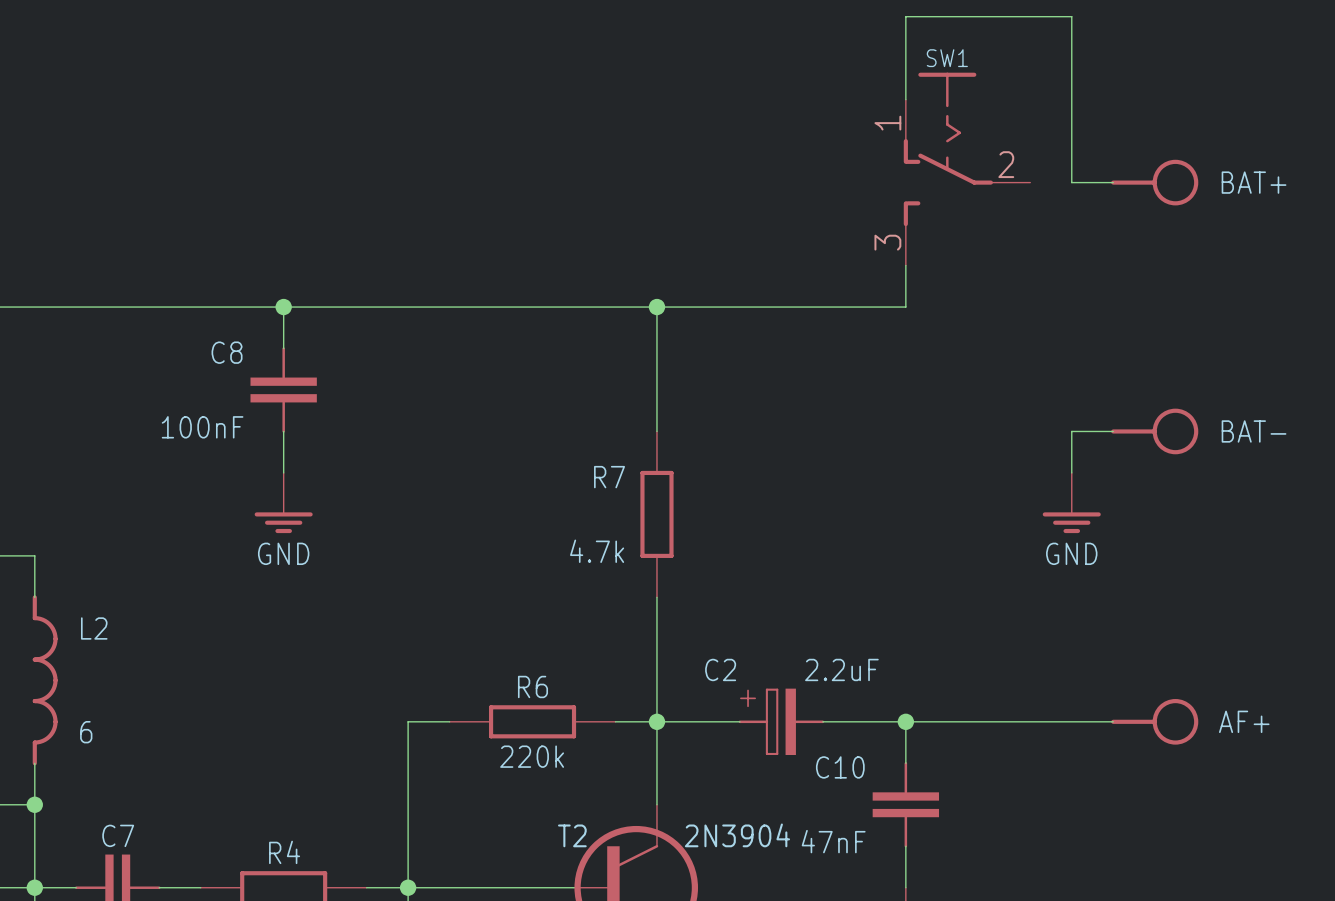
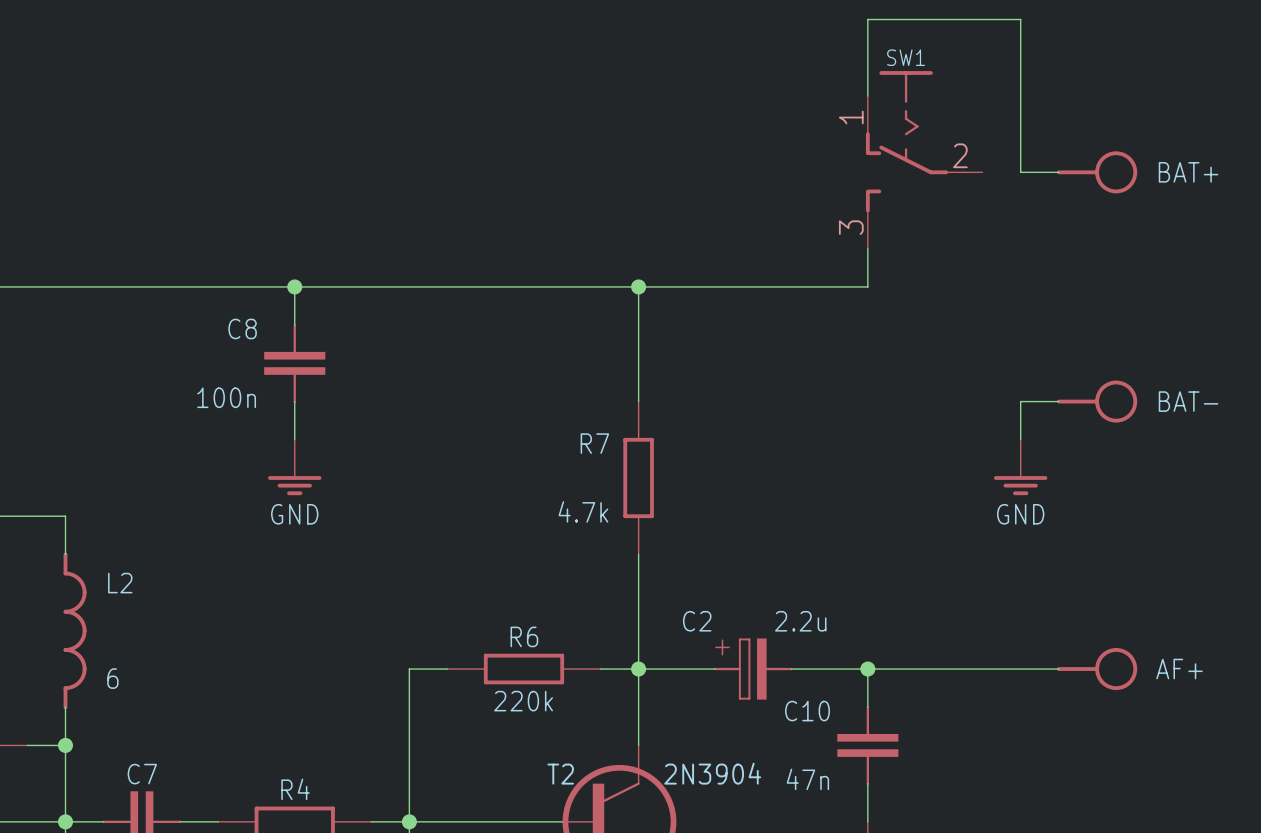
C8 value: 100nF (202, 427) -> 100n (226, 397)
C2 value: 2.2uF (841, 669) -> 2.2u (800, 621)
C10 value: 47nF (833, 841) -> 47n (807, 779)

